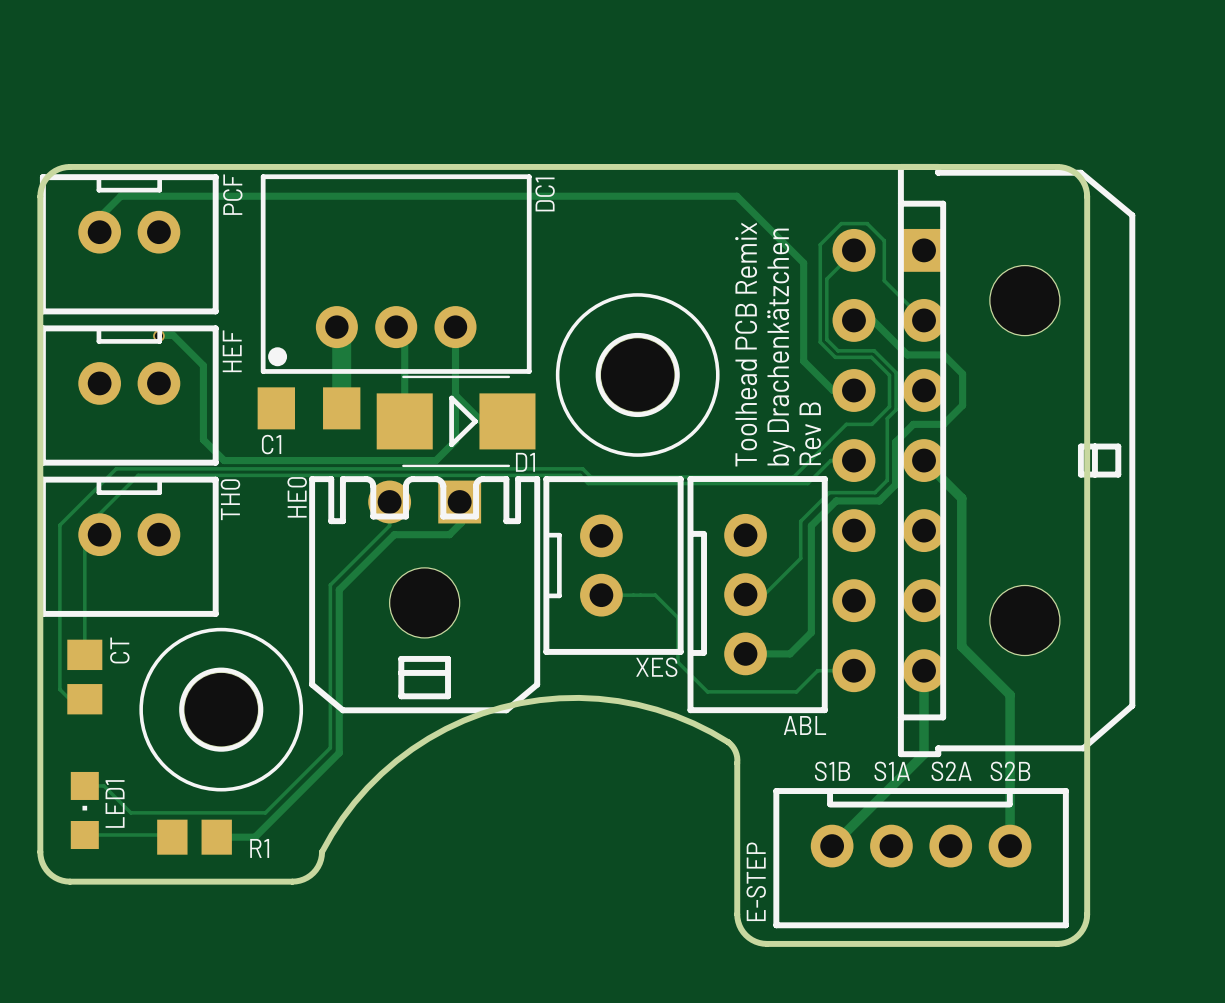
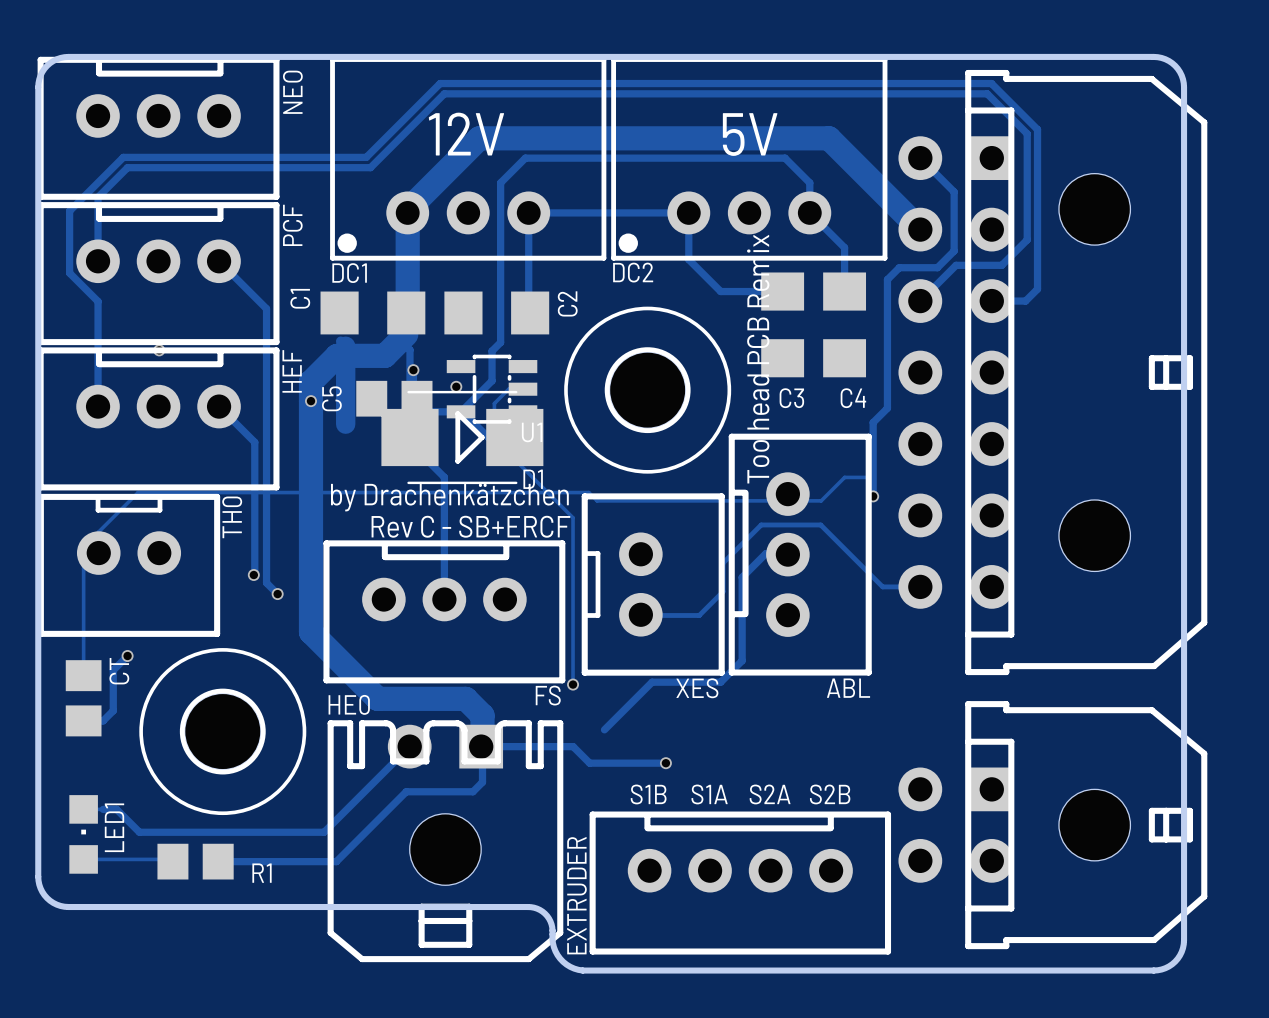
NEO: none -> (158, 128)
text: none -> 12V (466, 134)
text: none -> 5V (750, 134)
track: none -> (920, 158) (954, 191) (954, 251) (937, 267) (899, 267) (887, 279) (887, 408) (873, 422) (873, 496)
DC2: none -> (749, 158)
DC1 name rotation: 0° (545, 194) -> 90° clockwise (349, 273)
DC1 name position: DC1 (545, 194) -> DC1 (349, 273)
board edge: (40, 196) (42, 185) (49, 175) (58, 169) (69, 166) (1057, 166) (1065, 167) (1075, 173) (1083, 181) (1087, 196) (1087, 914) (1084, 925) (1078, 935) (1068, 941) (1057, 943) -> (38, 208) (38, 83) (42, 72) (47, 65) (53, 60) (64, 57) (1153, 56) (1161, 57) (1172, 63) (1179, 72) (1184, 87) (1183, 944) (1177, 958) (1168, 966) (1161, 969) (1075, 970)
track: none -> (920, 229) (829, 138) (479, 138) (407, 209) (406, 334) (384, 355) (337, 355) (311, 382) (311, 632) (377, 698) (465, 698) (482, 715) (482, 747)
track: (99, 232) (99, 217) (120, 196) (736, 196) (803, 263) (803, 361) (832, 390) (853, 390) -> none
PCF: (129, 244) -> none
track: none -> (98, 261) (98, 197) (127, 167) (370, 167) (444, 93) (987, 93) (1027, 133) (1027, 239) (1001, 265) (956, 265) (920, 301)
track: none -> (219, 261) (266, 308) (266, 582) (277, 594)
track: (853, 250) (826, 279) (826, 339) (838, 350) (874, 350) (896, 372) (896, 409) (887, 418) (887, 480) (874, 492) (829, 492) (800, 521) (800, 558) (764, 594) (745, 594) -> none
PCF: none -> (158, 273)
DC1 position: (396, 274) -> (468, 158)
track: none -> (782, 291) (720, 291) (688, 259) (688, 212) (528, 212) (530, 312)
track: none -> (844, 291) (844, 247) (809, 212) (809, 182) (785, 158) (525, 158) (500, 182) (500, 342) (492, 351) (492, 380) (461, 411) (430, 411) (413, 395) (413, 370)
track: none -> (991, 301) (1025, 301) (1037, 289) (1037, 129) (991, 83) (440, 83) (366, 157) (123, 157) (69, 211) (69, 273) (98, 301) (98, 406)
C2: none -> (496, 312)
C3: none -> (782, 324)
C4: none -> (844, 324)
track: (853, 320) (872, 320) (907, 354) (943, 354) (962, 373) (962, 405) (943, 424) (913, 424) (895, 442) (895, 484) (879, 500) (836, 500) (811, 525) (811, 632) (790, 653) (745, 653) -> none
track: (924, 320) (884, 280) (884, 240) (867, 223) (841, 223) (820, 244) (820, 342) (835, 357) (871, 357) (889, 375) (889, 406) (871, 424) (846, 424) (793, 477) (590, 477) (582, 468) (116, 468) (59, 525) (59, 689) (69, 699) (84, 699) -> (127, 655) (113, 670) (113, 710) (103, 720) (83, 720)
track: (455, 327) (455, 440) (435, 460) (224, 460) (203, 439) (203, 365) (173, 335) (158, 335) -> none
text rotation: 0° (781, 347) -> 90° clockwise (449, 497)
text position: by Drachenkätzchen (781, 347) -> by Drachenkätzchen (449, 497)
via: none -> (413, 370)
via: none -> (456, 386)
part: none -> (492, 389)
track: none -> (523, 389) (508, 389) (494, 403) (494, 439) (573, 517) (573, 684)
C5: none -> (394, 398)
via: none -> (311, 401)
track: none -> (219, 406) (254, 442) (253, 575)
HEF: (129, 395) -> none
HEF: none -> (158, 418)
C1 position: (309, 408) -> (372, 312)
track: none -> (415, 448) (444, 477) (444, 599)
text: Rev B (810, 433) -> none
C1 name rotation: 0° (271, 444) -> 90° counterclockwise (300, 298)
C1 name position: C1 (271, 444) -> C1 (300, 298)
track: (924, 460) (961, 498) (961, 646) (1010, 694) (1010, 846) -> none
part position: (983, 460) -> (1052, 372)
via: none -> (873, 496)
text rotation: 0° (297, 497) -> 90° clockwise (349, 704)
text position: HE0 (297, 497) -> HE0 (349, 704)
track: (389, 502) (389, 525) (330, 585) (330, 747) (265, 812) (130, 812) (103, 785) -> (409, 746) (324, 832) (139, 832) (116, 809) (103, 809)
track: (459, 502) (461, 503) (461, 522) (449, 534) (394, 534) (339, 589) (339, 752) (255, 837) -> (482, 747) (482, 782) (472, 791) (406, 791) (336, 861) (257, 861)
text: none -> Rev C - SB+ERCF (470, 526)
track: none -> (787, 554) (765, 553) (742, 577) (742, 660) (720, 682) (652, 682) (604, 729)
via: none -> (253, 575)
XES position: (613, 565) -> (653, 584)
track: none -> (920, 586) (882, 586) (820, 524) (761, 524) (723, 563) (723, 591) (699, 615) (640, 614)
via: none -> (277, 594)
FS: none -> (444, 611)
part position: (424, 594) -> (445, 841)
ABL position: (757, 594) -> (800, 554)
track: (601, 595) (655, 595) (677, 617) (677, 662) (707, 691) (796, 691) (817, 670) (853, 670) -> none
via: none -> (127, 655)
via: none -> (573, 684)
track: (924, 670) (924, 754) (832, 846) -> none
track: none -> (482, 747) (481, 746) (573, 746) (589, 763) (665, 763)
via: none -> (665, 763)
text position: S1B (832, 771) -> S1B (648, 794)
text position: S1A (892, 771) -> S1A (709, 794)
text position: S2A (951, 771) -> S2A (770, 794)
text position: S2B (1010, 771) -> S2B (830, 794)
part: none -> (1052, 825)
EXTRUDER: none -> (740, 883)
E-STEP: (921, 858) -> none
board edge: (292, 881) (307, 877) (315, 870) (321, 859) (322, 852) (331, 834) (367, 787) (396, 761) (428, 738) (463, 720) (520, 703) (579, 697) (618, 701) (675, 715) (711, 732) (728, 742) (734, 748) (737, 760) (737, 918) (741, 929) (748, 937) (759, 942) (766, 943) -> (295, 907) (530, 907) (539, 909) (549, 918) (552, 927) (553, 947) (560, 958) (570, 966) (578, 969) (779, 970)

